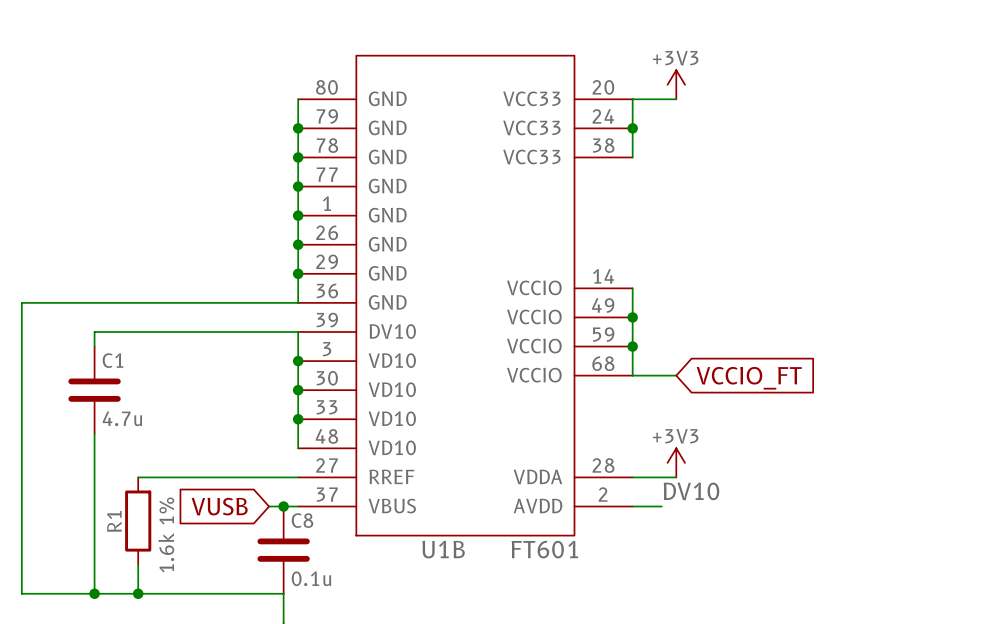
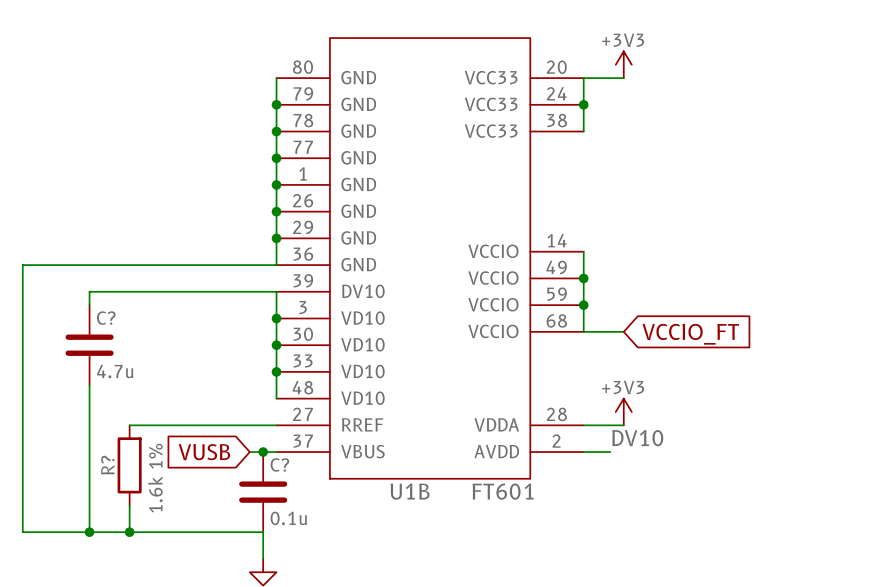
C1 name: C1 (113, 360) -> C? (106, 318)
C8 name: C8 (302, 520) -> C? (279, 464)
R1 name: R1 (114, 521) -> R? (107, 465)

